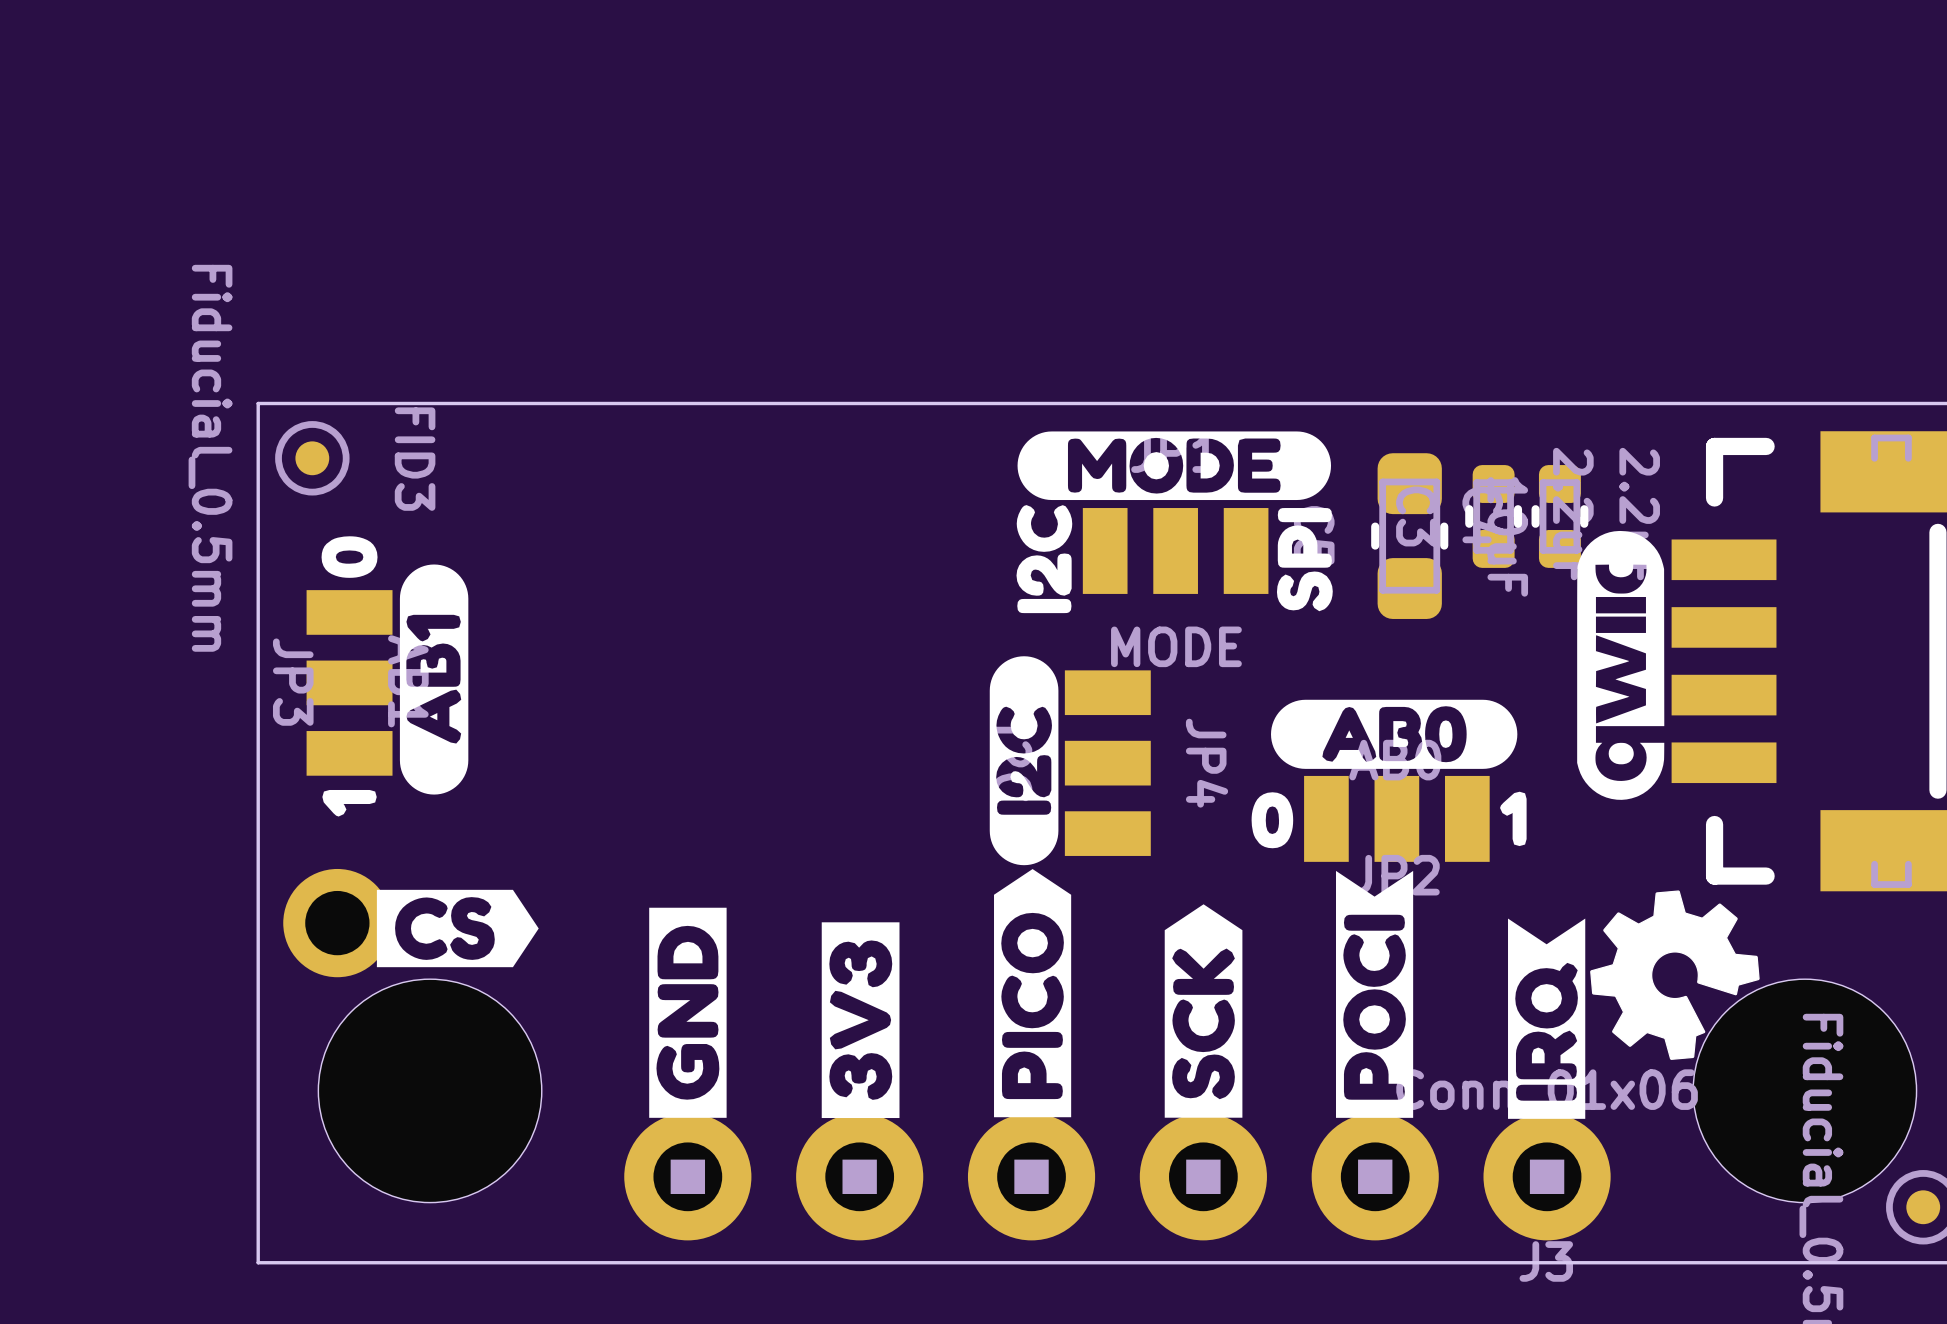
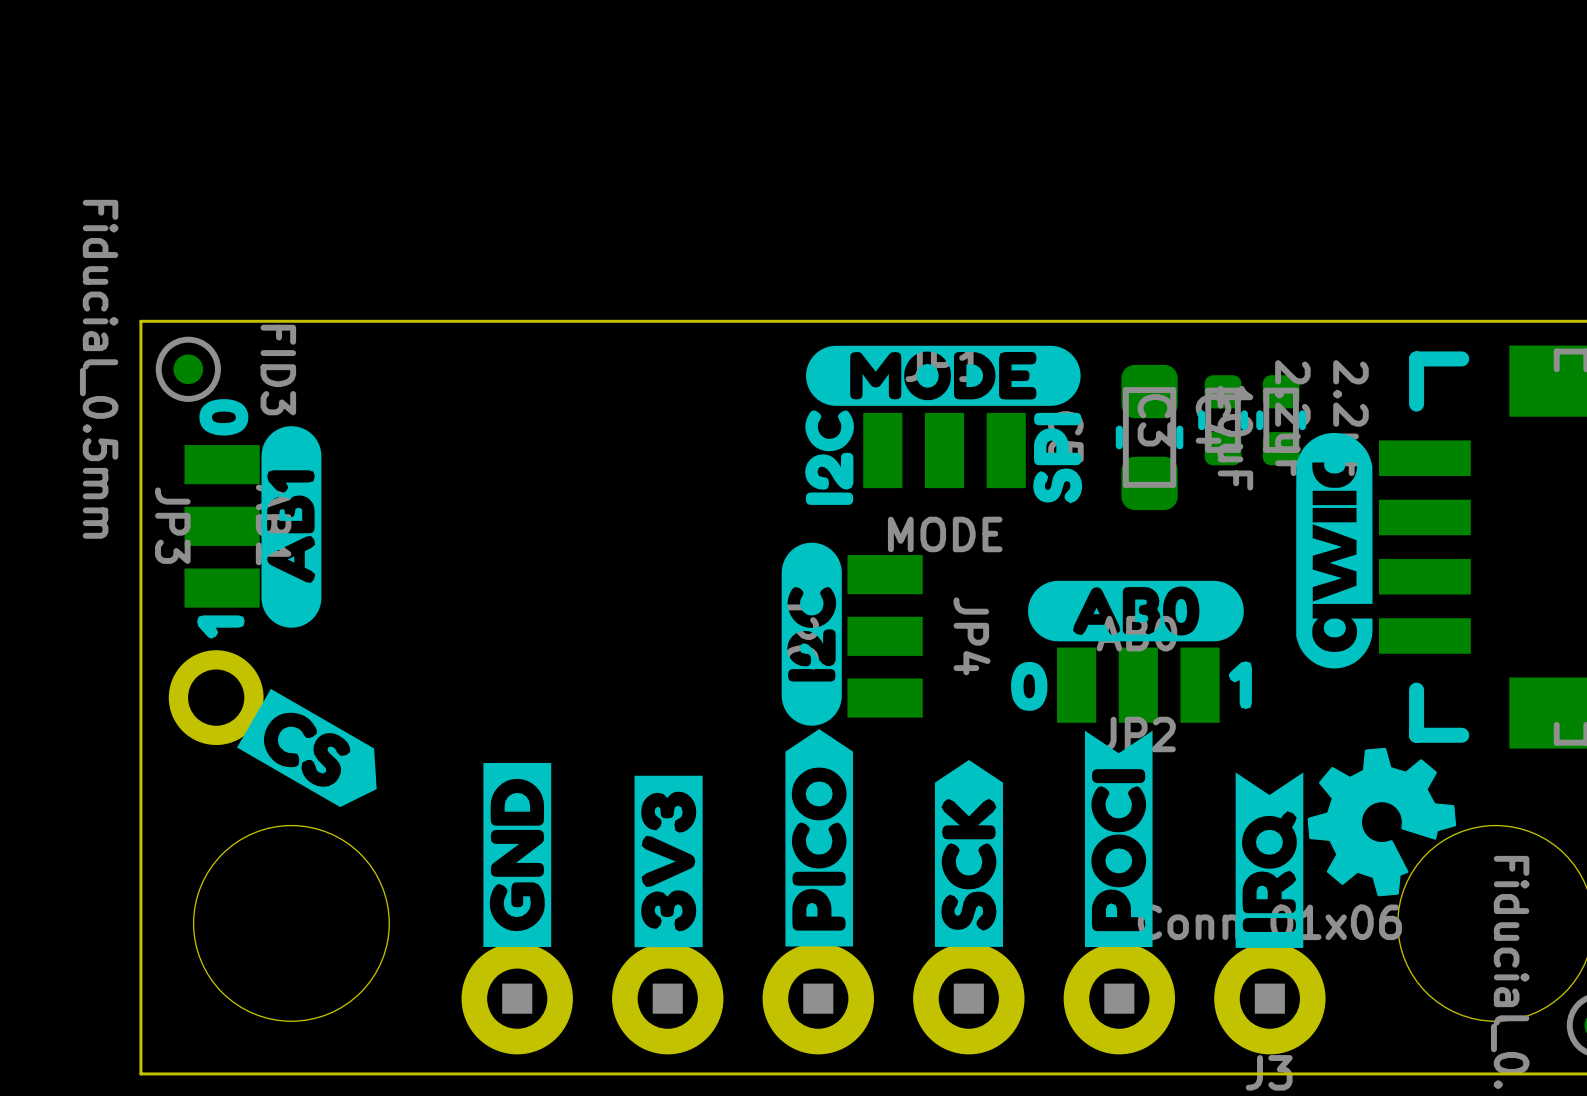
drawing position: (349, 557) -> (223, 417)
drawing position: (434, 679) -> (291, 526)
JP3 position: (349, 682) -> (222, 526)
drawing position: (349, 803) -> (220, 627)
drawing shape: [376, 889, 539, 968] -> [237, 688, 377, 808]
part position: (337, 923) -> (216, 697)

